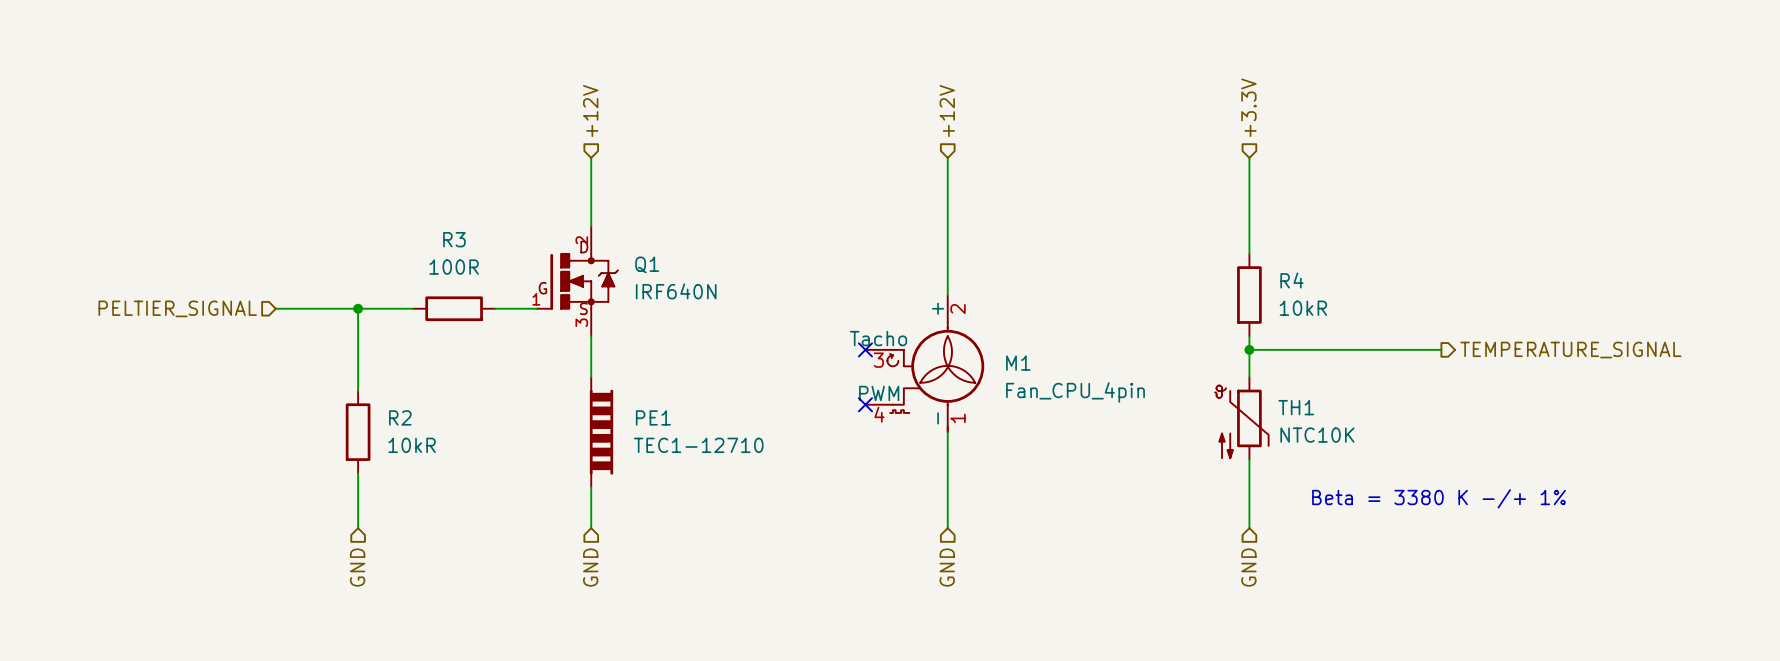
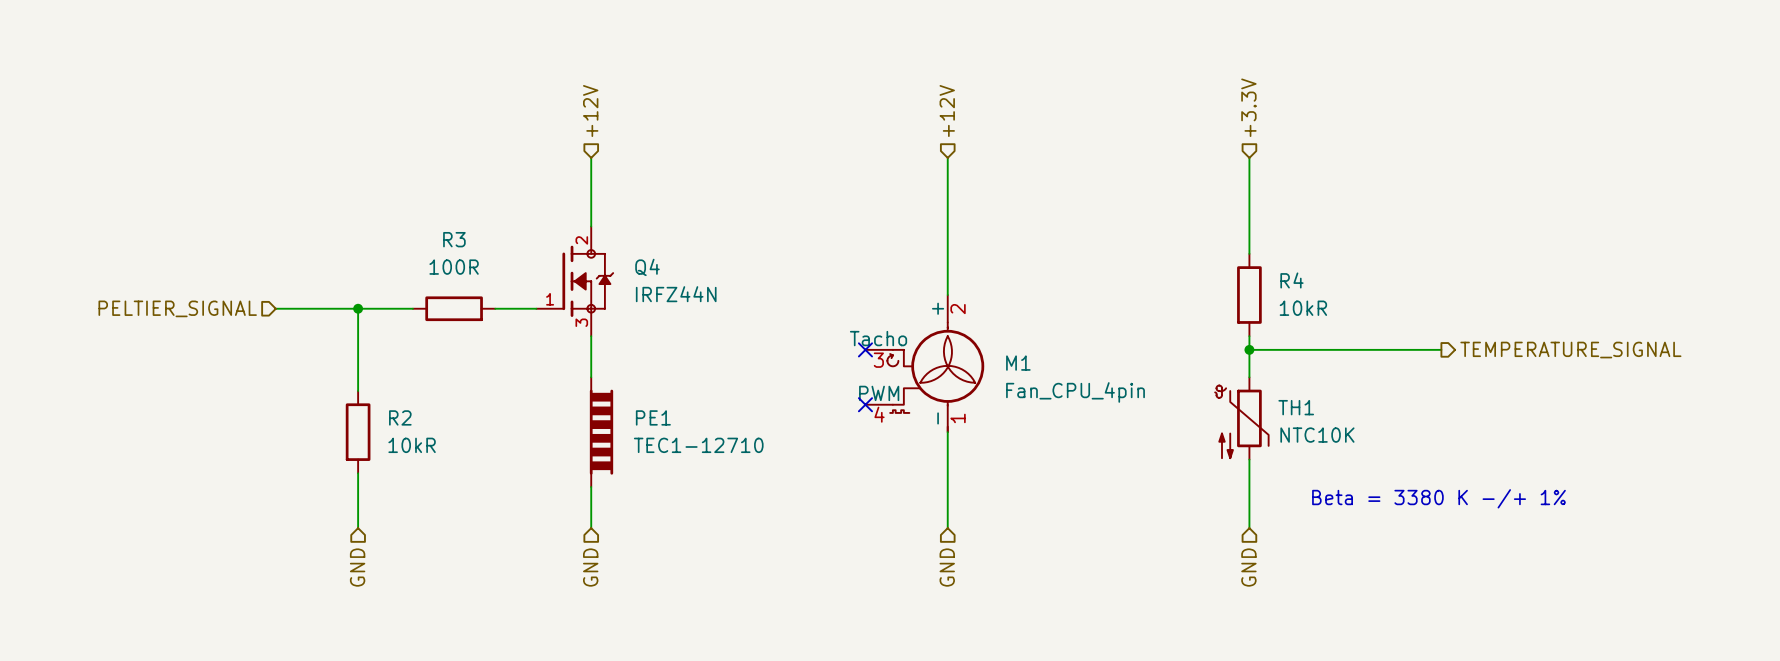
Q4: none -> IRFZ44N (575, 281)
Q1: IRF640N (577, 281) -> none

